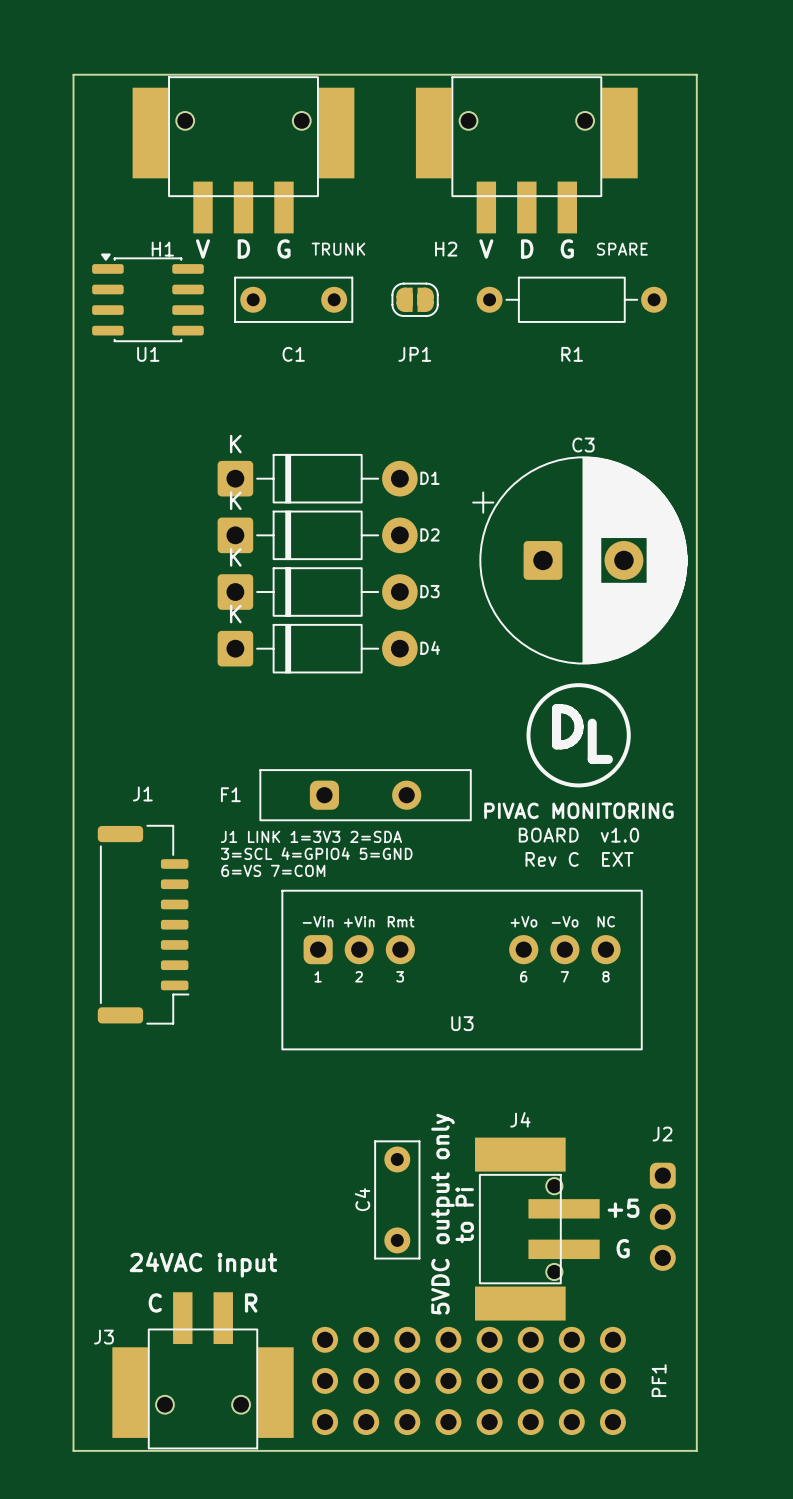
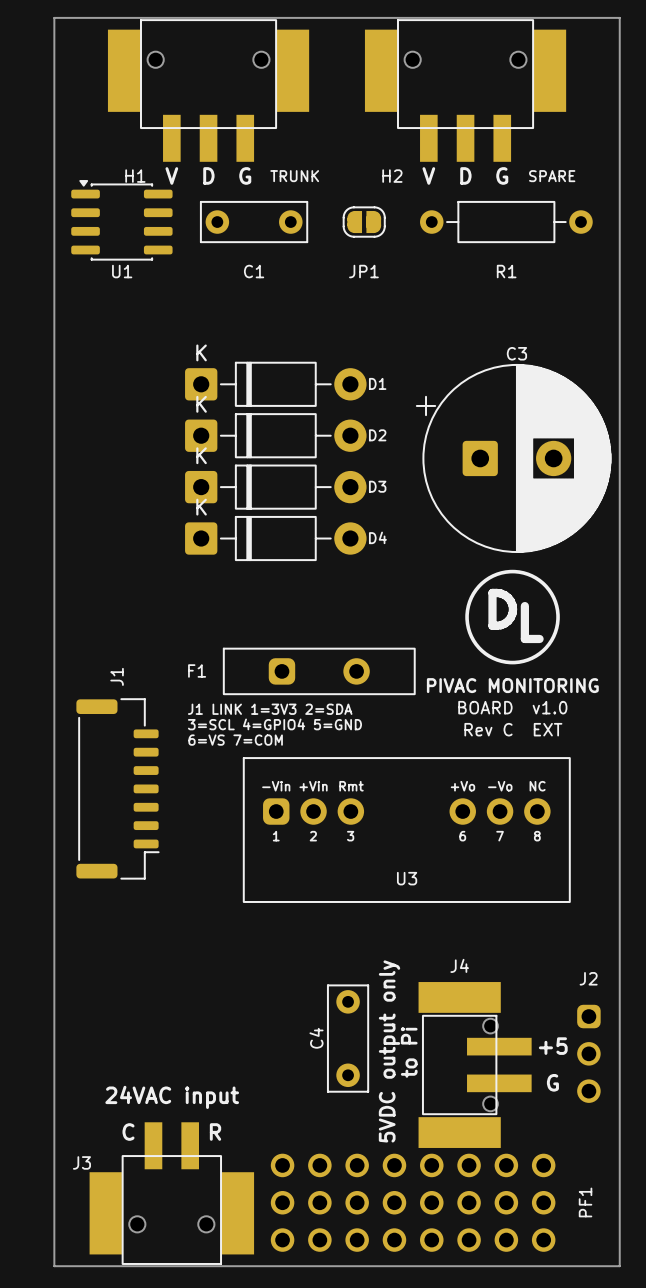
J1 name rotation: 0° (142, 793) -> 90° counterclockwise (117, 676)

